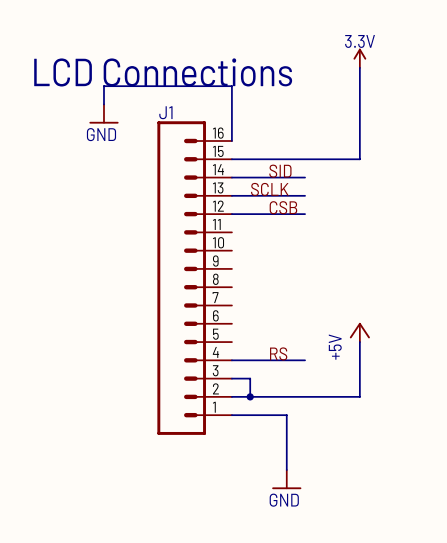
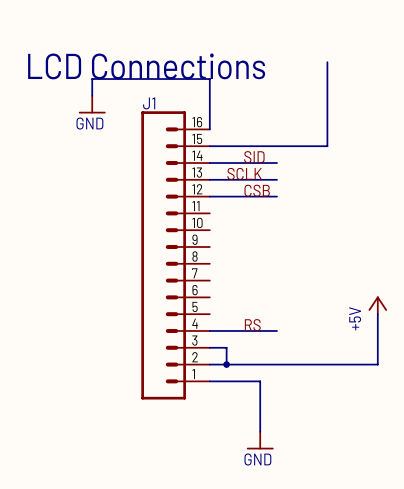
power symbol: 3.3V (359, 58) -> none
power symbol position: +5V (359, 332) -> +5V (377, 305)
wire: (359, 342) (359, 396) -> (377, 314) (377, 364) (327, 364)

